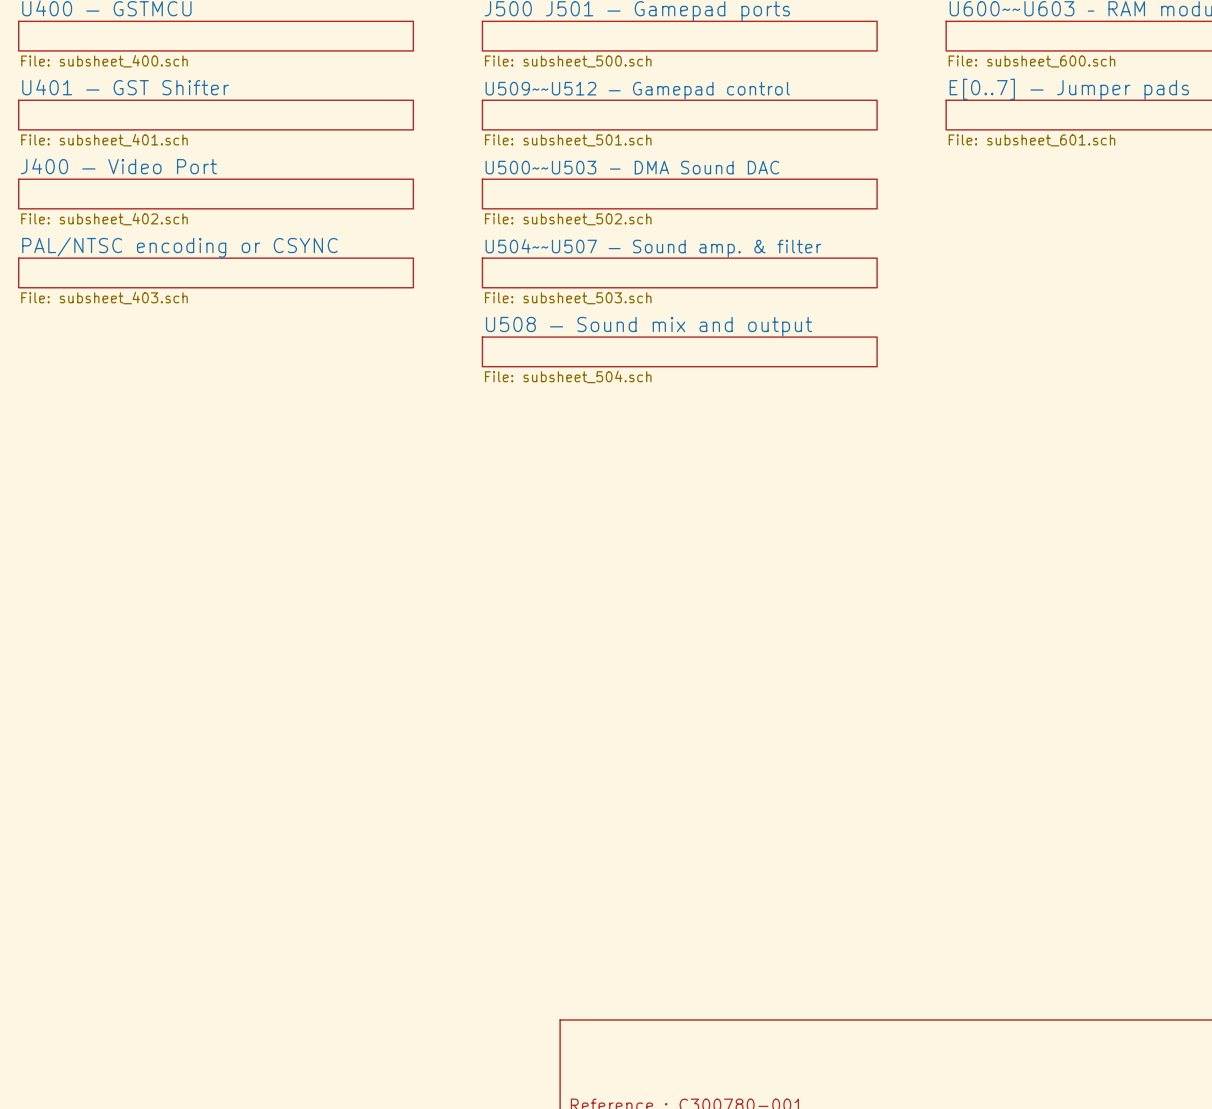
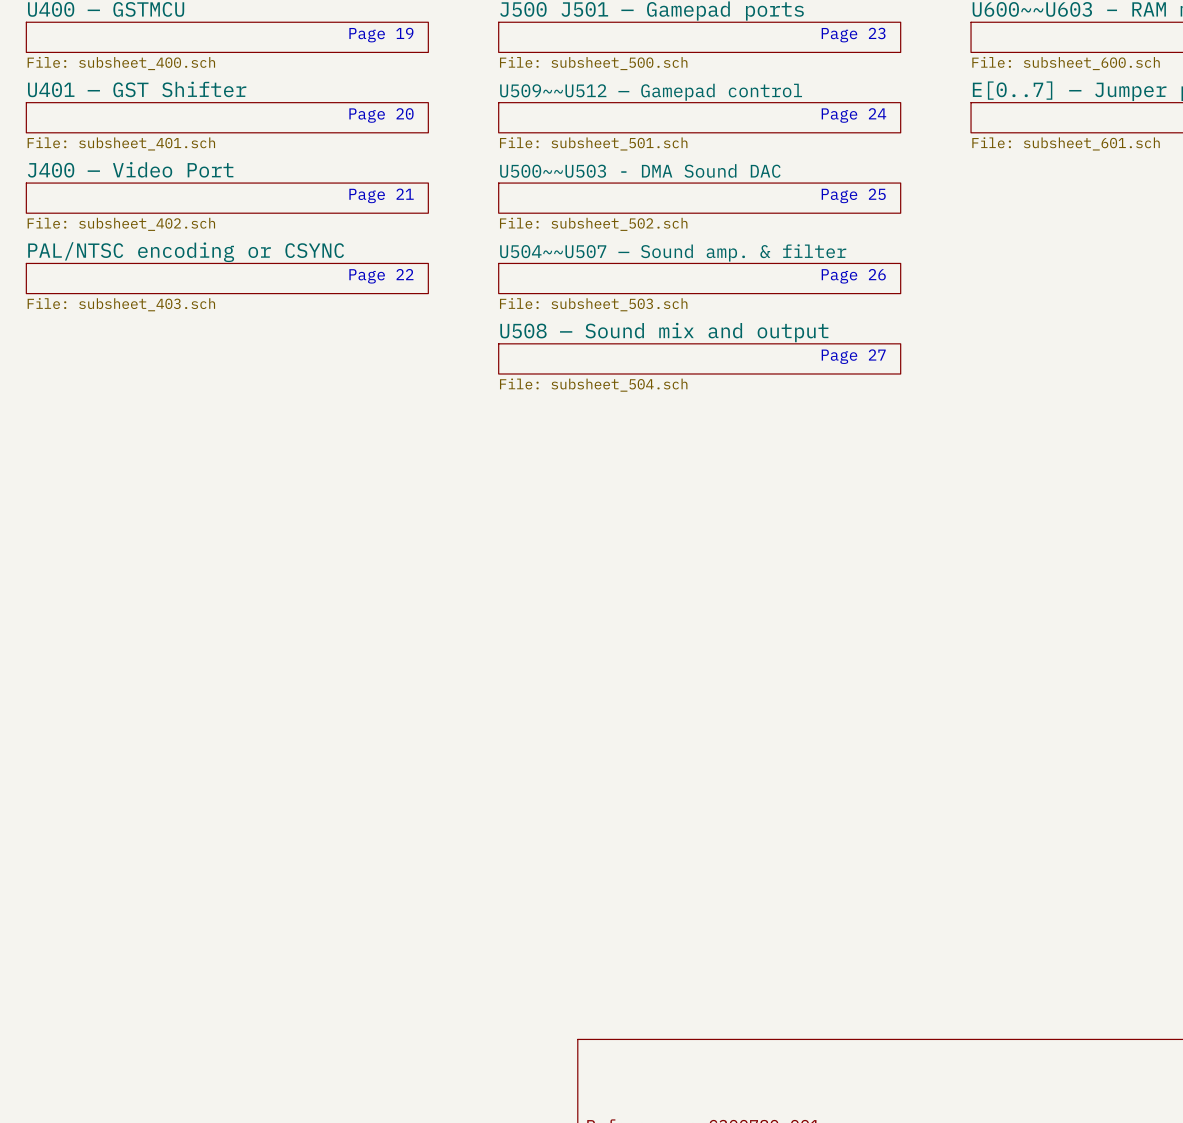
text: none -> Page 19 (381, 35)
text: none -> Page 23 (853, 35)
text: none -> Page 24 (853, 115)
text: none -> Page 20 (381, 115)
text: none -> Page 21 (381, 195)
text: none -> Page 25 (853, 195)
text: none -> Page 22 (381, 276)
text: none -> Page 26 (853, 276)
text: none -> Page 27 (853, 356)

